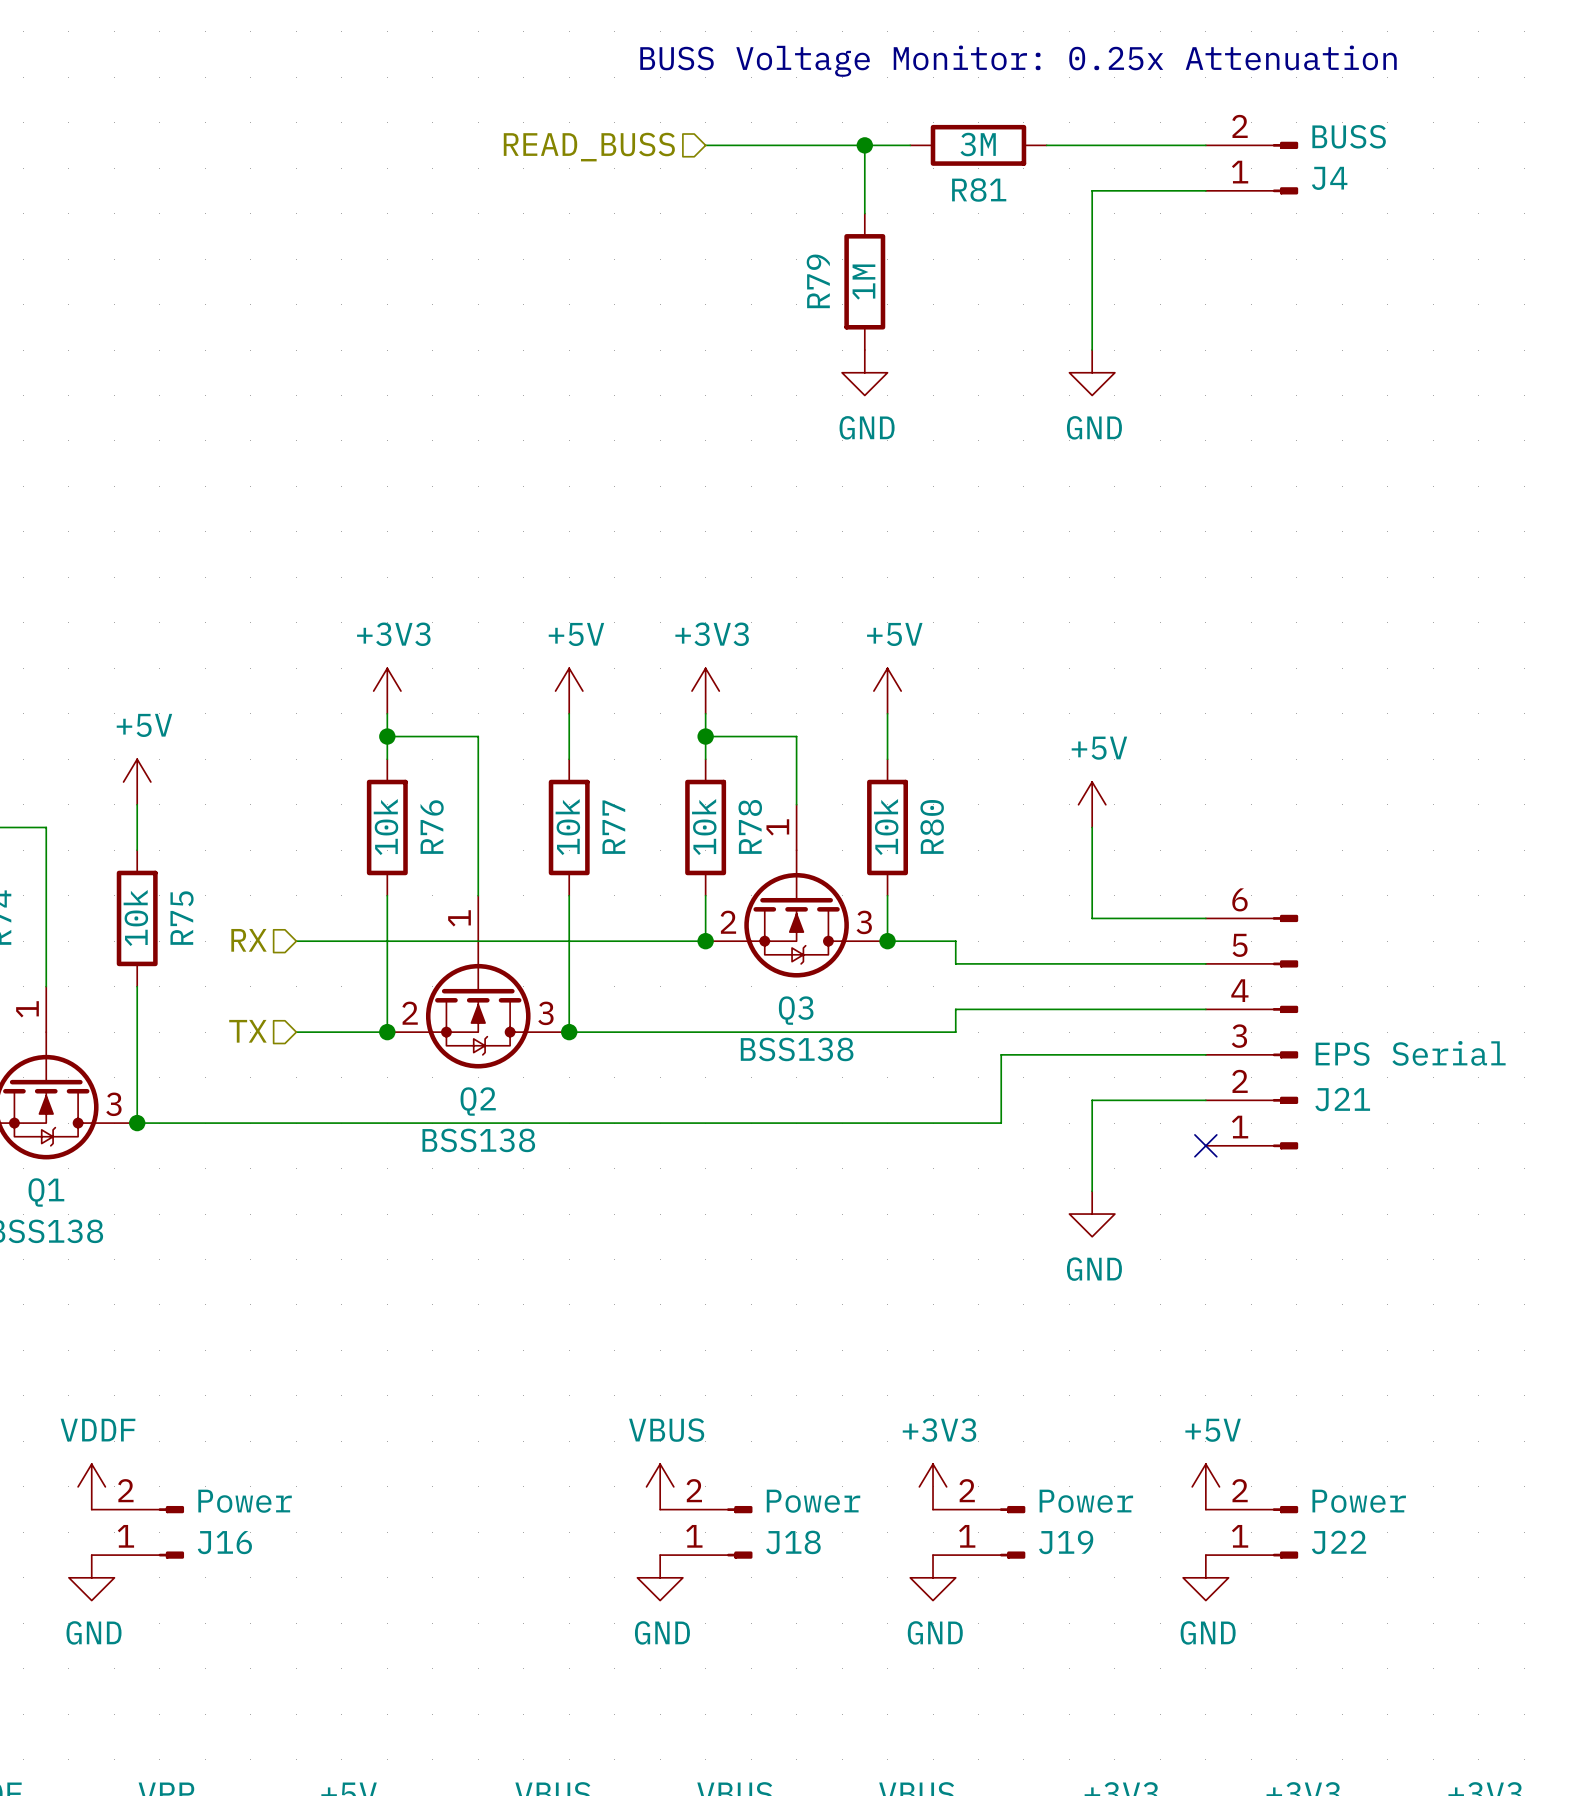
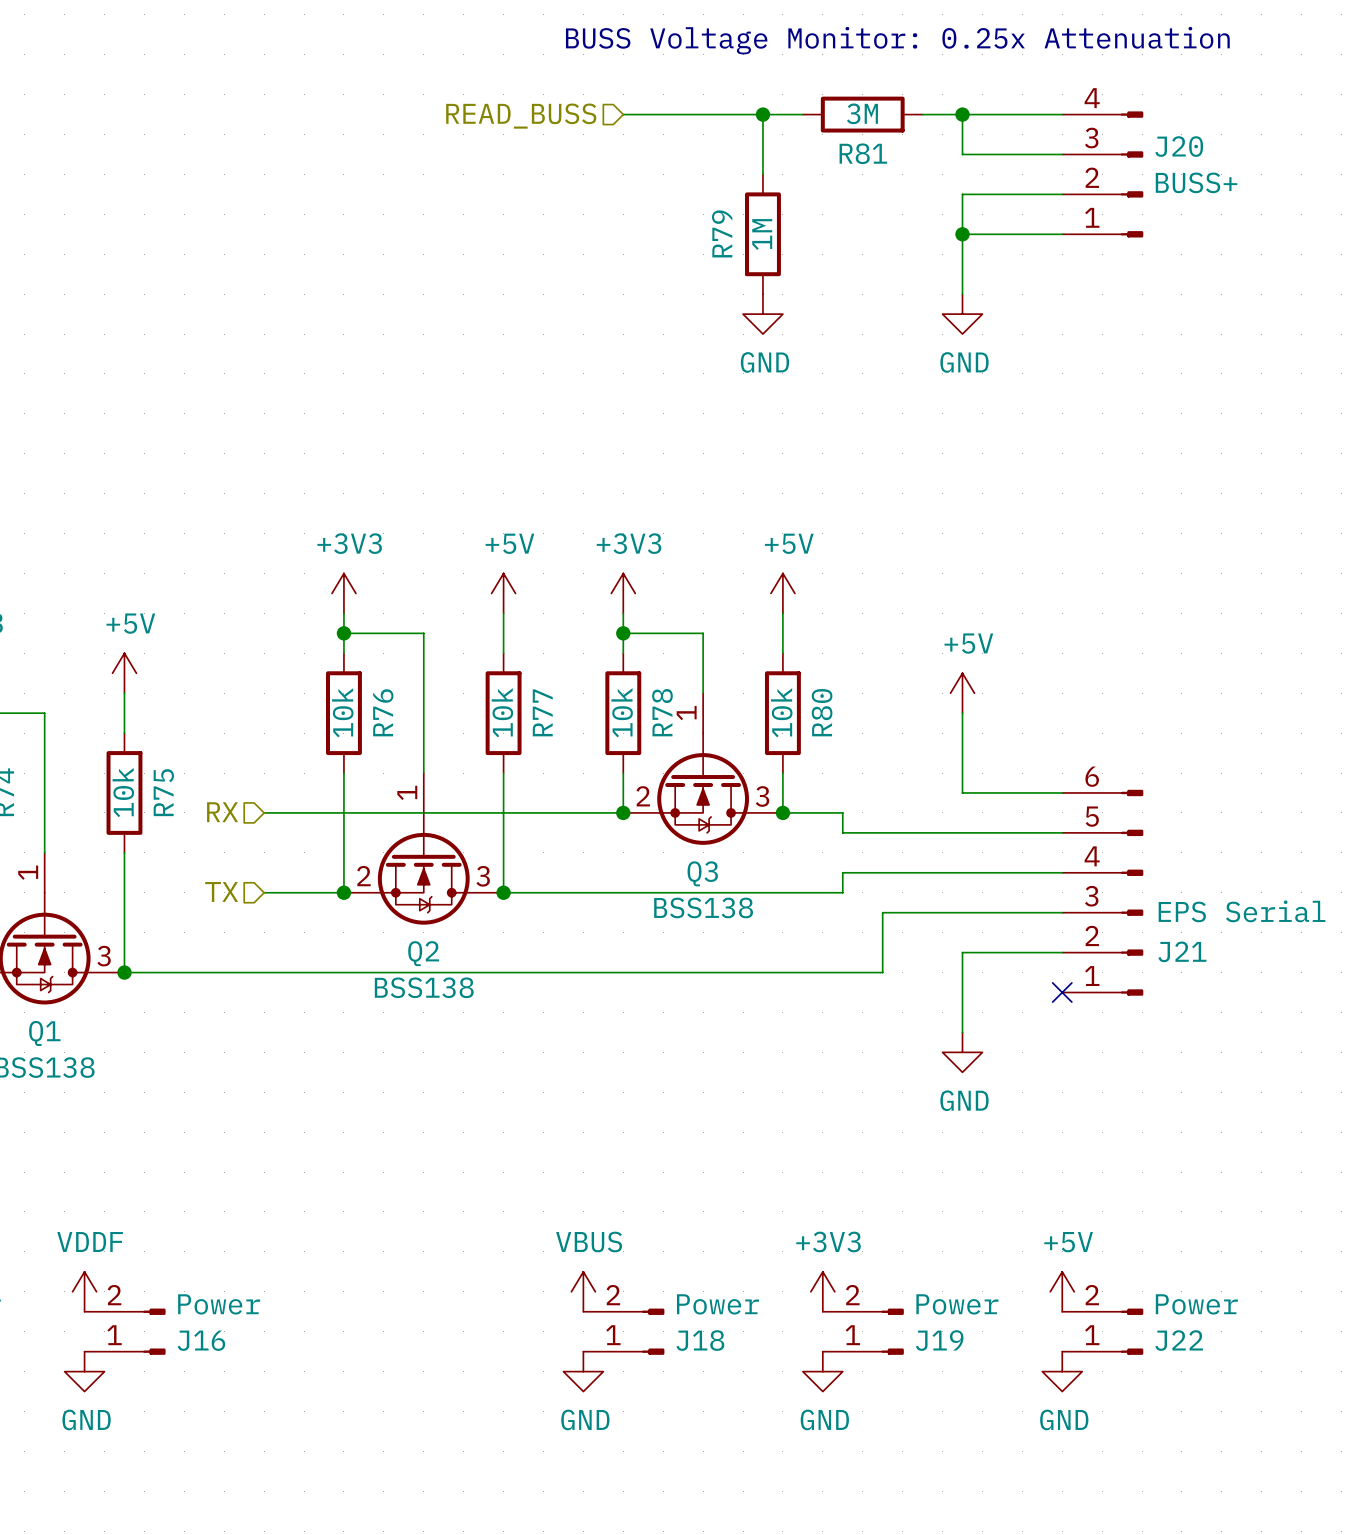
junction: none -> (962, 114)
J4: BUSS (1252, 168) -> none
wire: (1092, 190) (1092, 236) -> (962, 154) (962, 114)
J20: none -> BUSS+ (1102, 174)
wire: none -> (962, 194) (1062, 194)
wire: none -> (962, 234) (1062, 234)
junction: none -> (962, 234)

